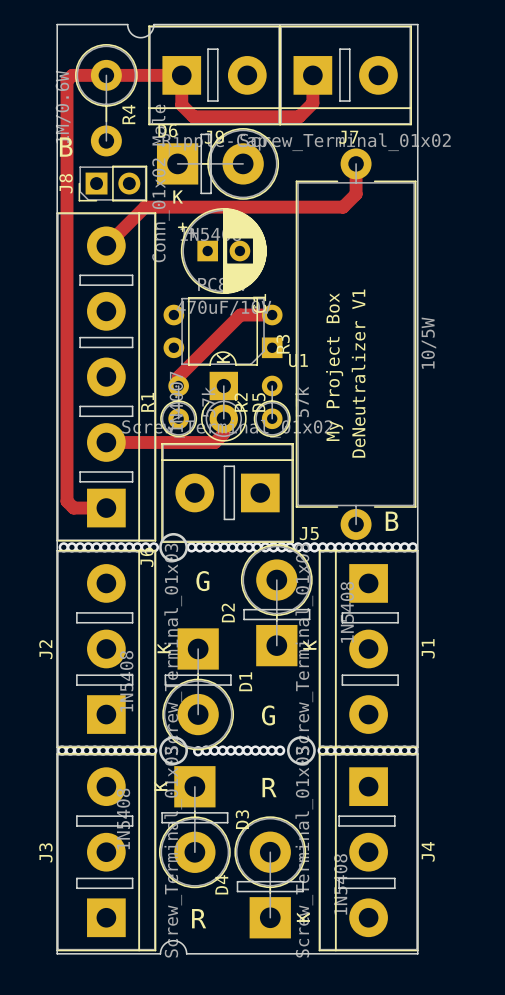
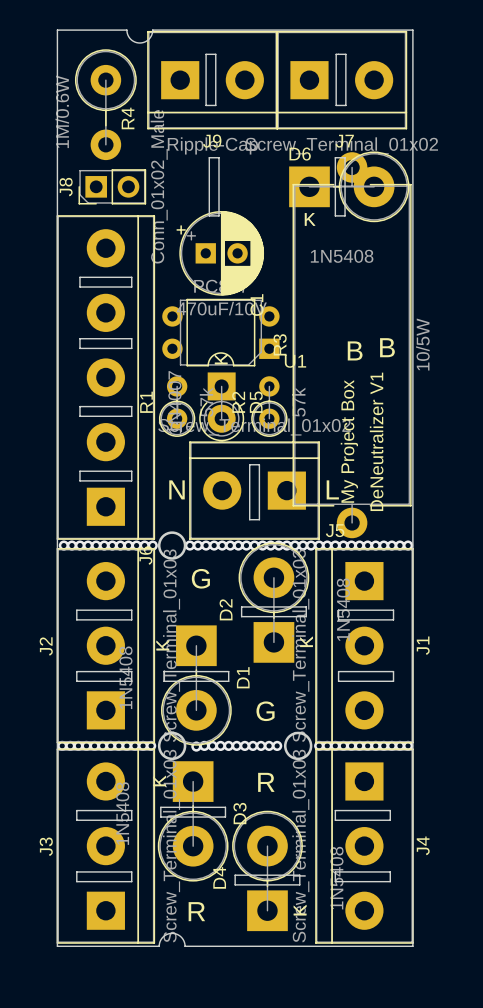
track: (312, 75) (312, 103) (299, 116) (193, 116) (181, 105) (181, 75) (72, 75) (67, 80) (67, 501) (73, 508) (106, 508) -> none
board edge: (201, 134) (211, 134) (211, 193) (201, 193) (201, 134) -> (209, 157) (219, 157) (219, 215) (209, 215) (209, 157)
text: B (66, 147) -> none
board edge: none -> (335, 157) (345, 157) (345, 215) (335, 215) (335, 157)
D6 position: (218, 163) -> (349, 186)
track: (356, 163) (356, 194) (343, 207) (145, 207) (106, 245) -> none
track: (272, 315) (240, 315) (178, 376) (178, 385) -> none
text: none -> B (387, 347)
text: none -> B (355, 350)
text position: My Project Box (334, 367) -> My Project Box (349, 441)
text position: DeNeutralizer V1 (358, 373) -> DeNeutralizer V1 (376, 441)
track: (223, 418) (223, 433) (214, 442) (106, 442) -> none
board edge: none -> (249, 464) (259, 464) (259, 519) (249, 519) (249, 464)
board edge: (224, 466) (234, 466) (234, 519) (224, 519) (224, 466) -> none
text: none -> N (176, 489)
text: none -> L (332, 489)
J5 position: (227, 492) -> (254, 490)
text: B (392, 521) -> none

